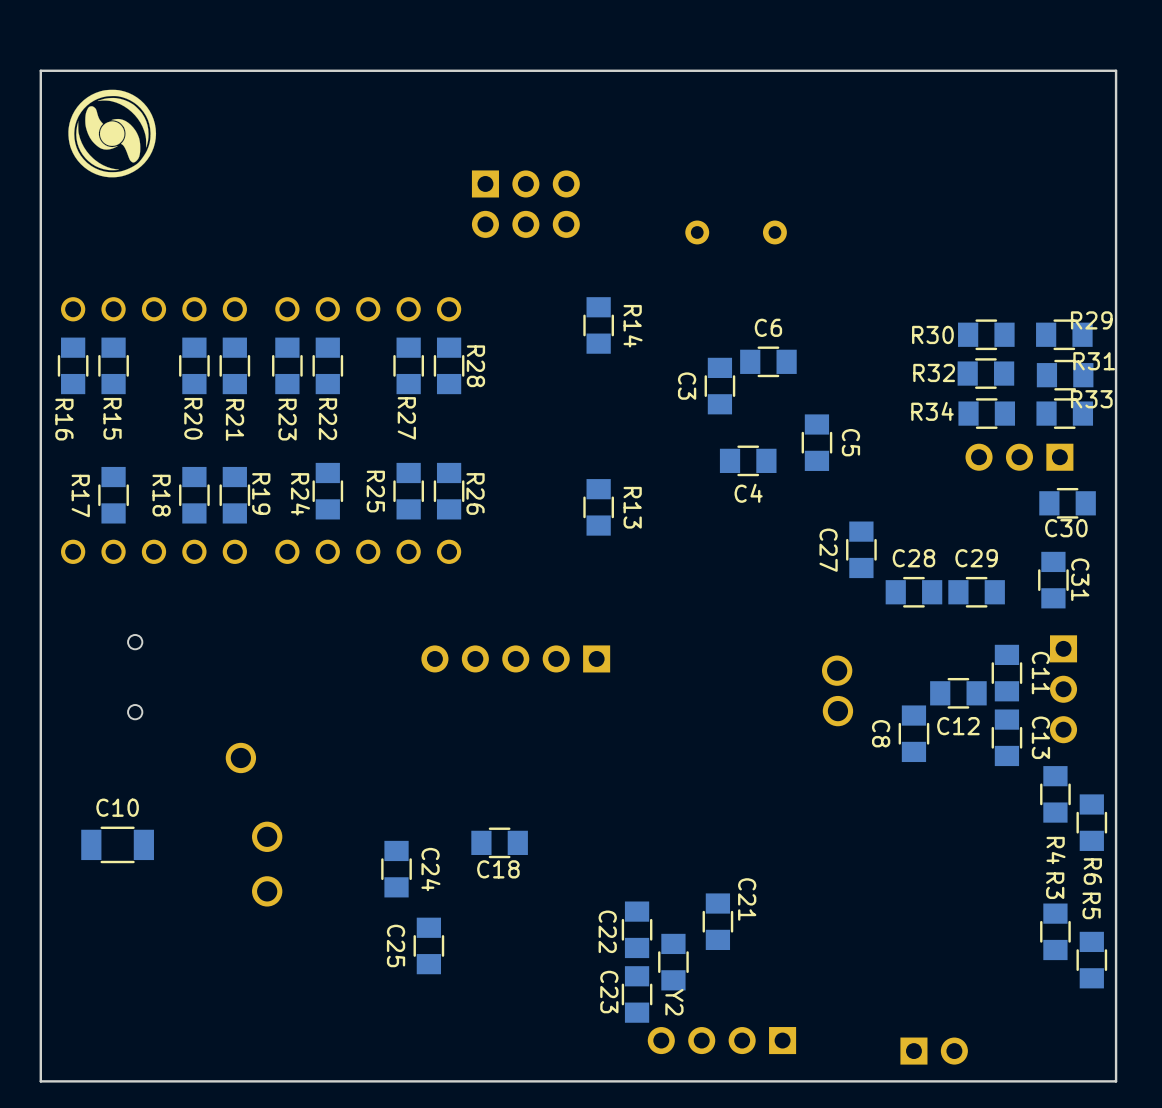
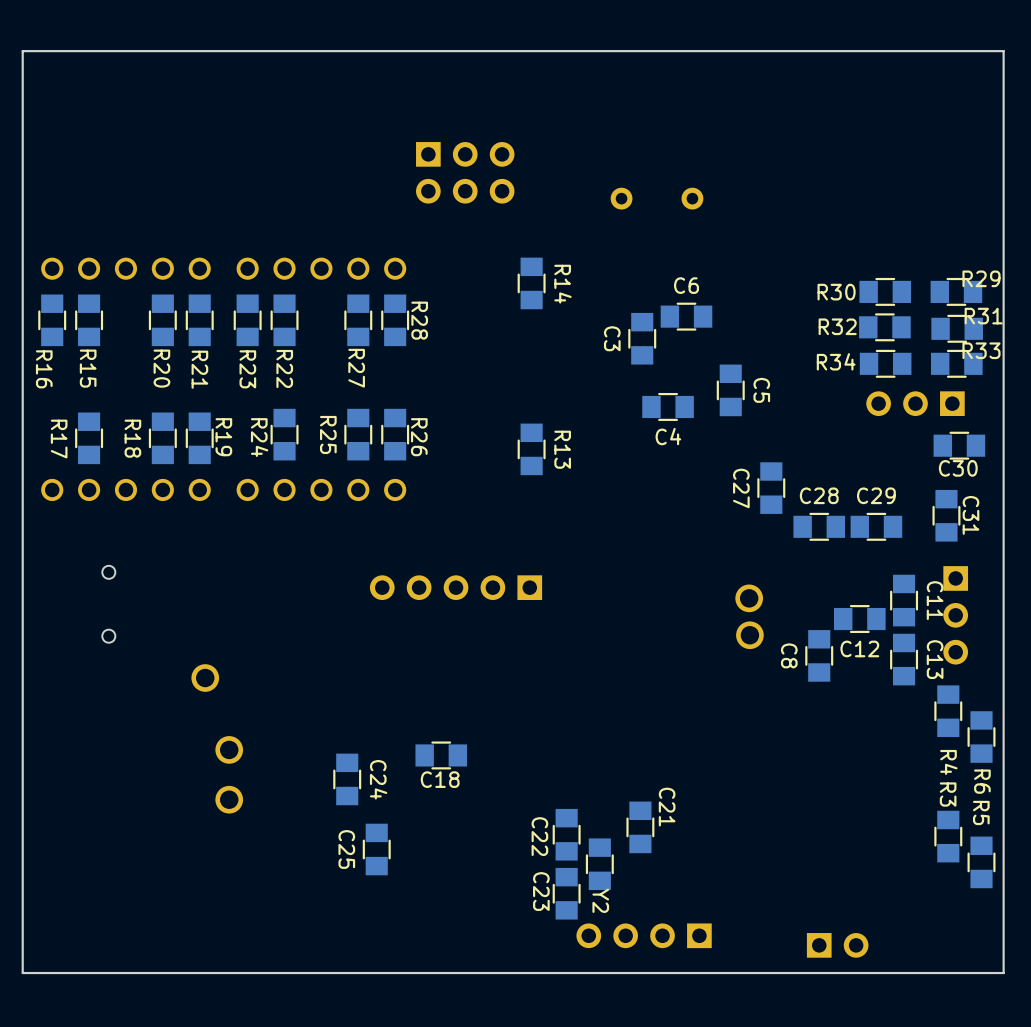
drawing: [68, 89, 157, 178] -> none
C10: (117, 844) -> none

